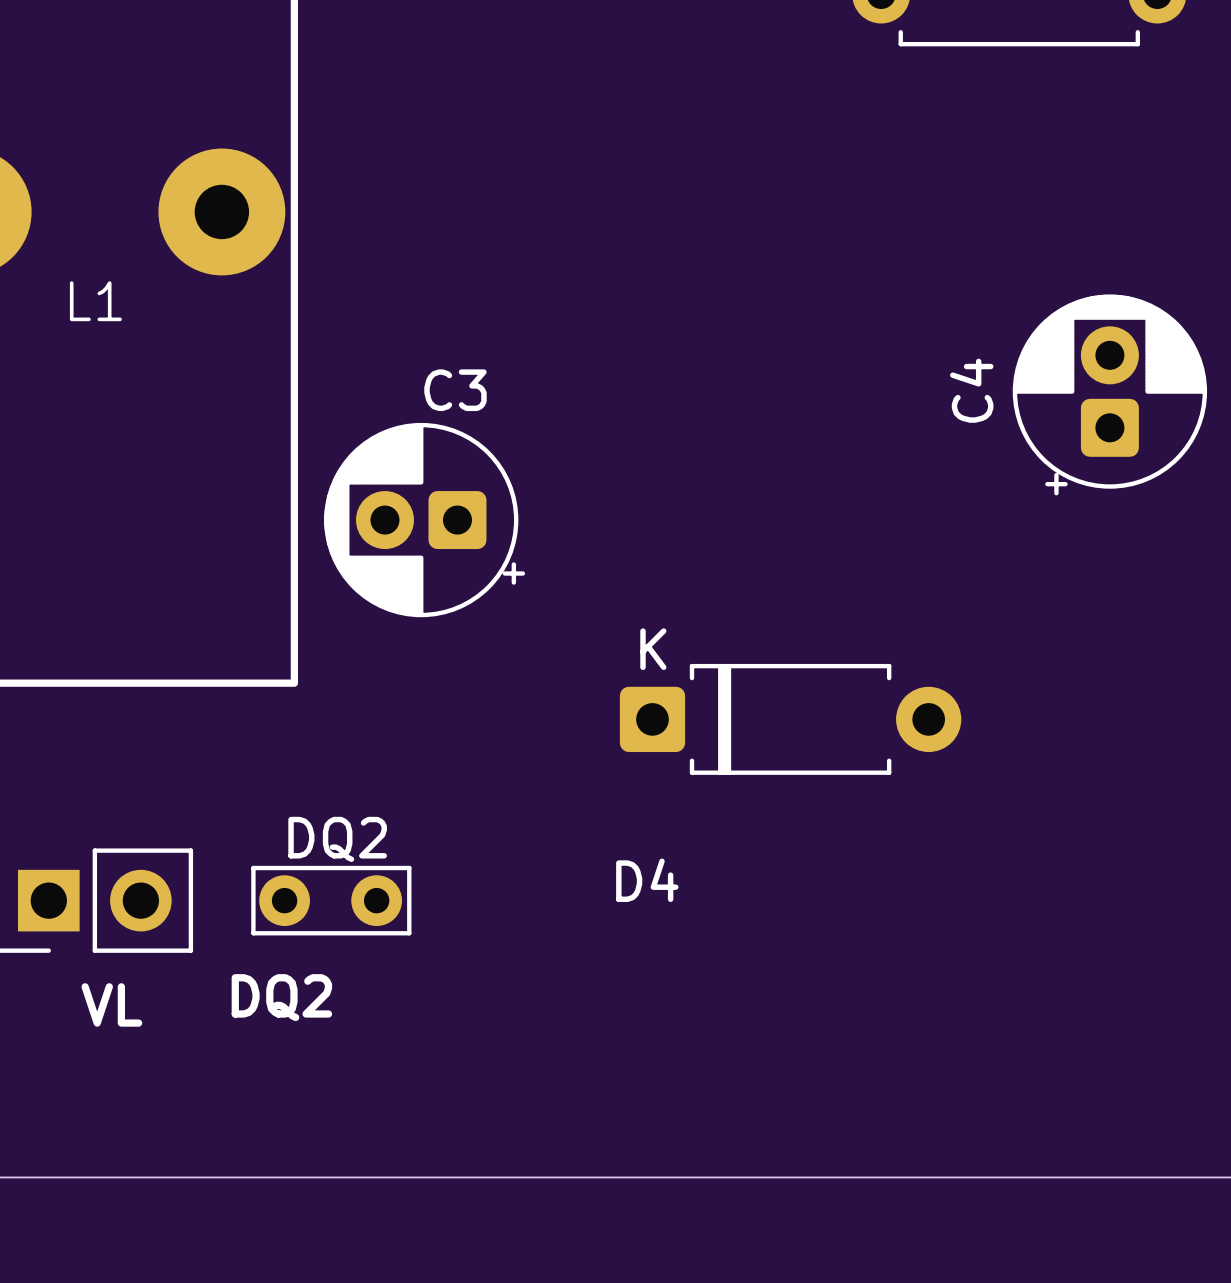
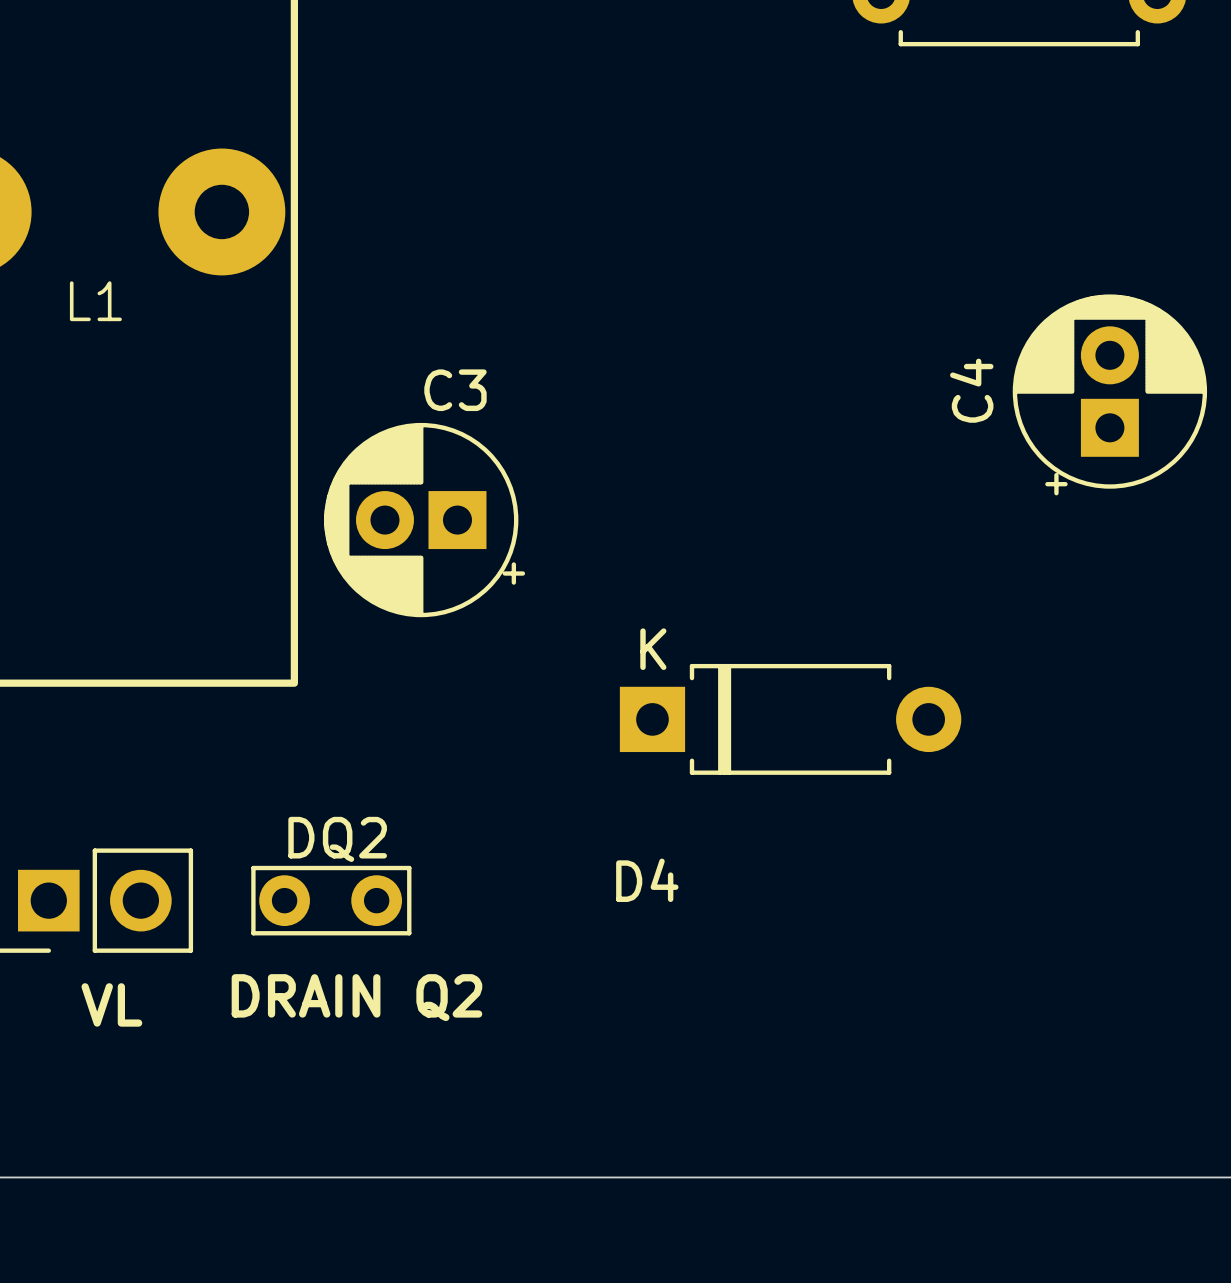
C4 footprint: [1012, 294, 1208, 496] -> [1012, 294, 1208, 496]
C3 footprint: [324, 422, 526, 618] -> [324, 422, 526, 618]
D4 footprint: [619, 663, 962, 775] -> [619, 663, 962, 775]
text: DQ2 (281, 997) -> DRAIN Q2 (356, 997)

